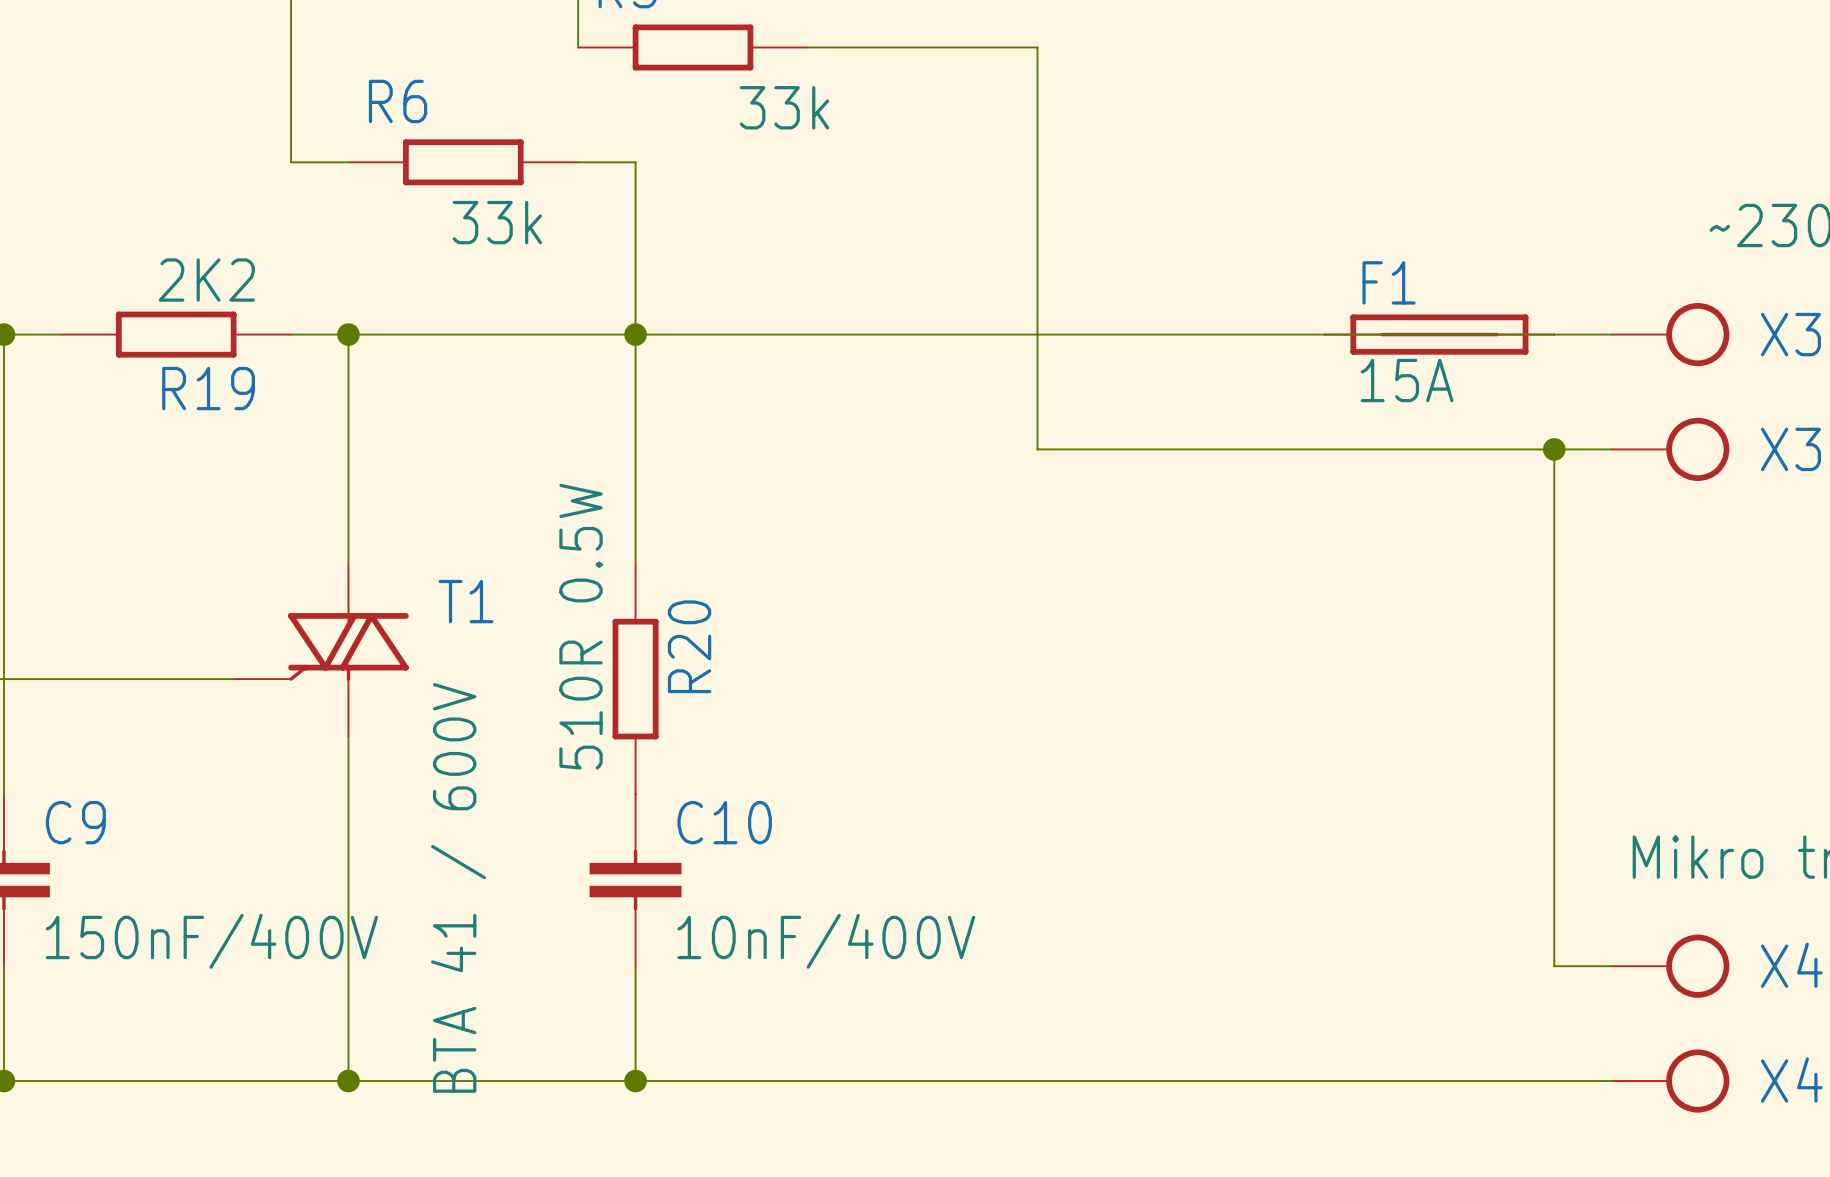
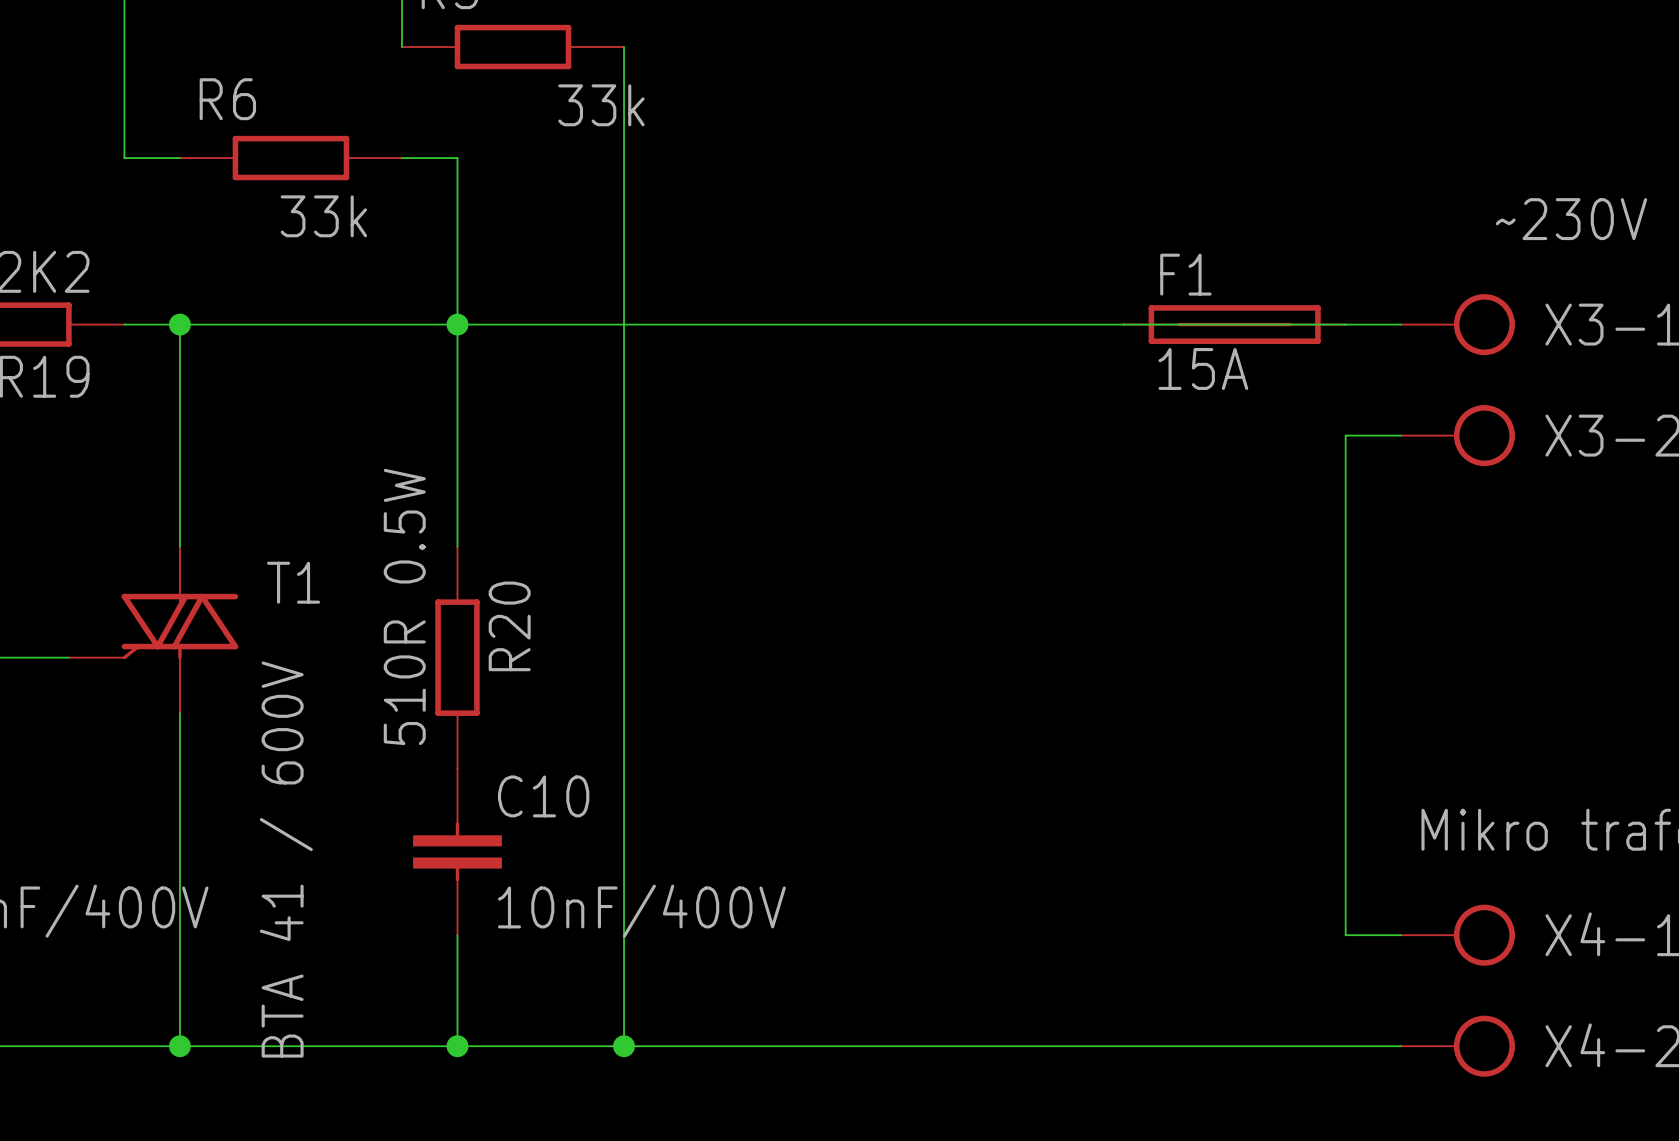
wire: (807, 47) (1037, 47) (1037, 449) (1554, 449) -> (624, 47) (624, 1046)
junction: (1554, 449) -> none
junction: none -> (624, 1046)

